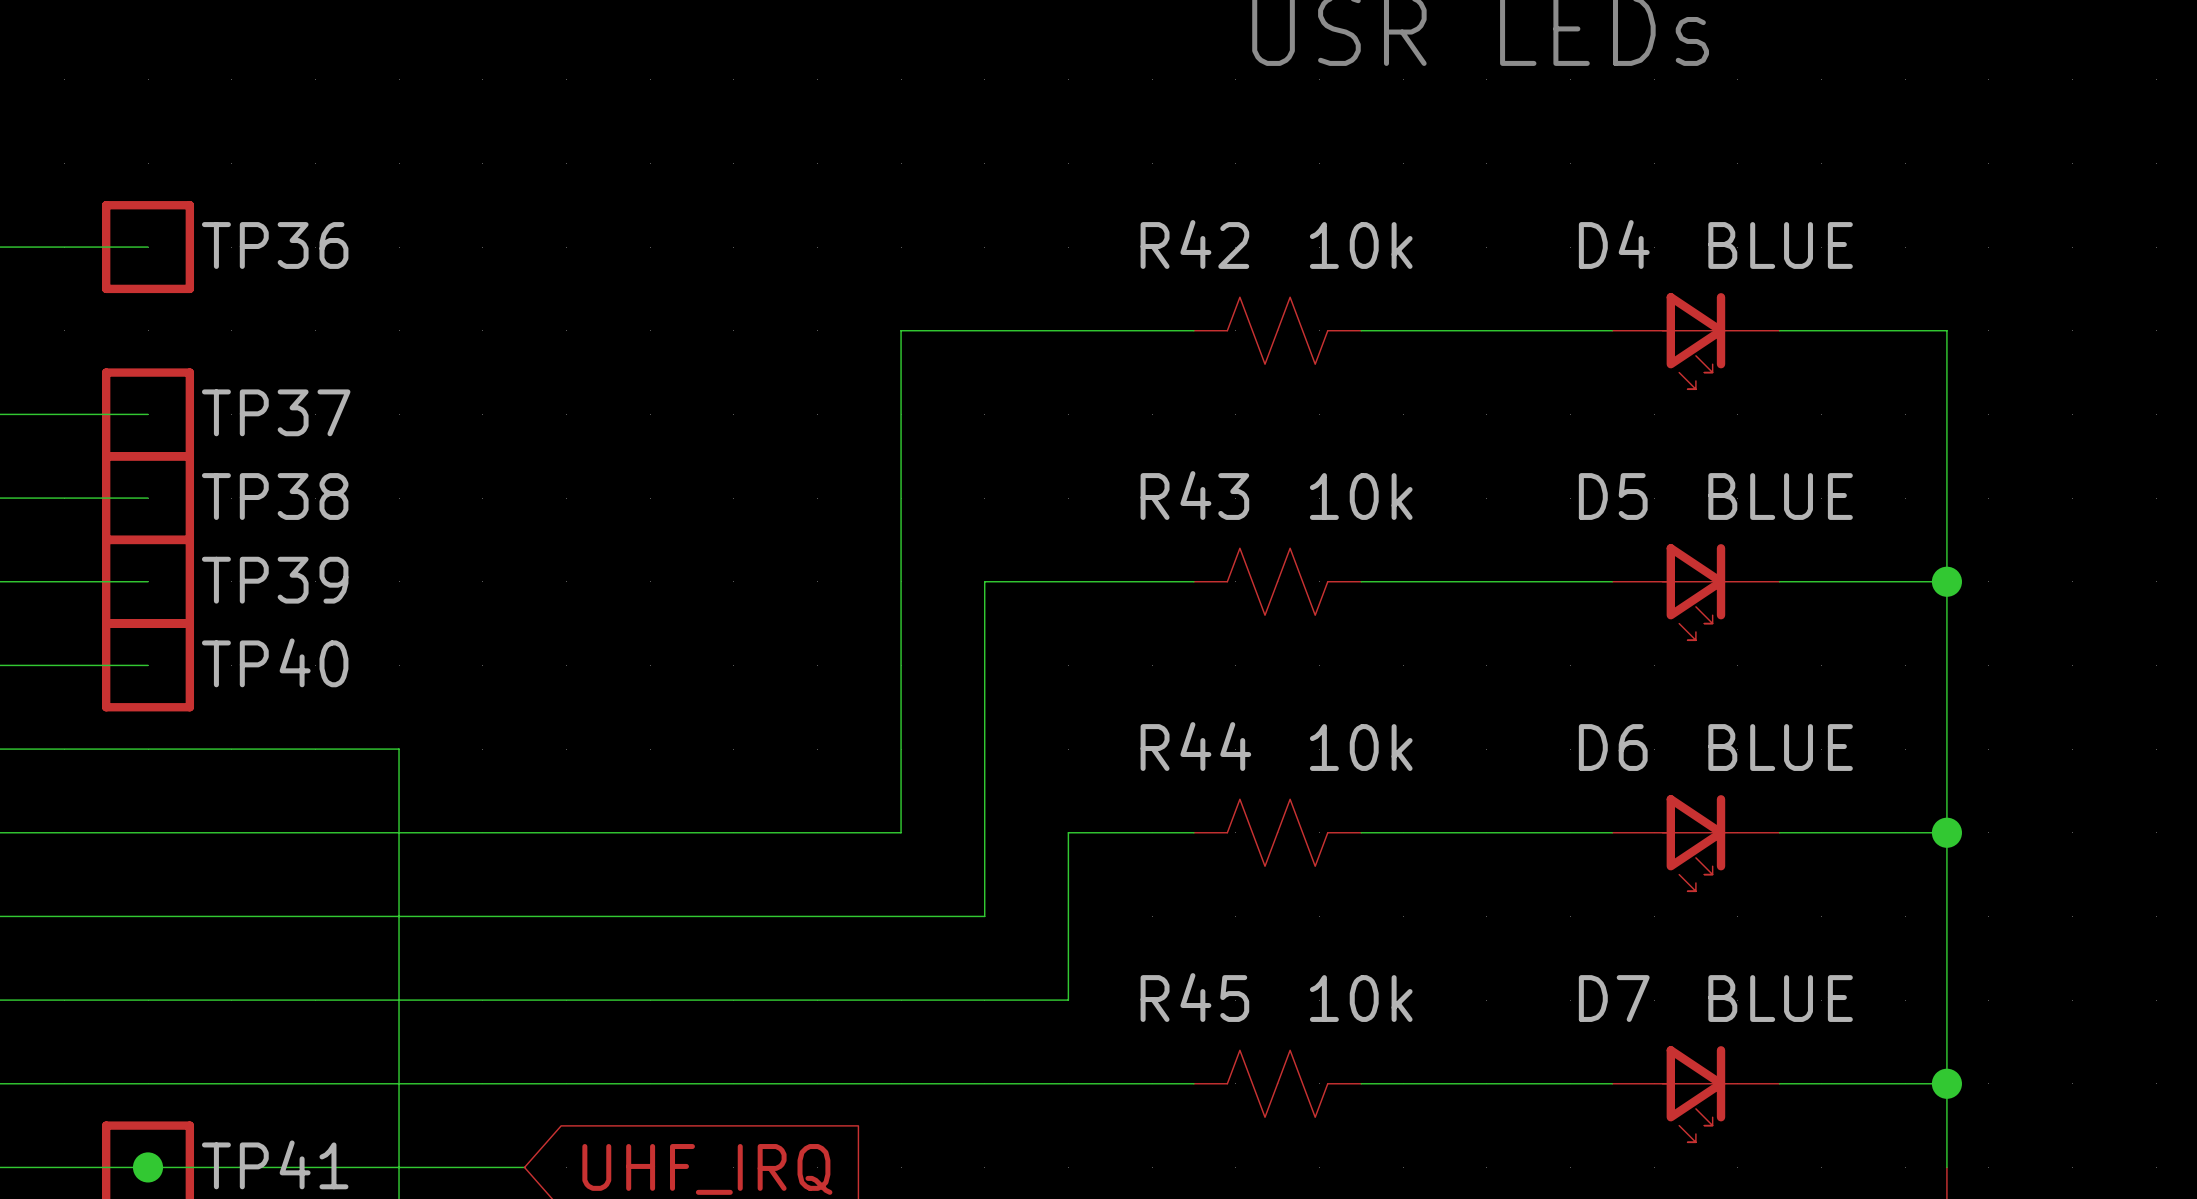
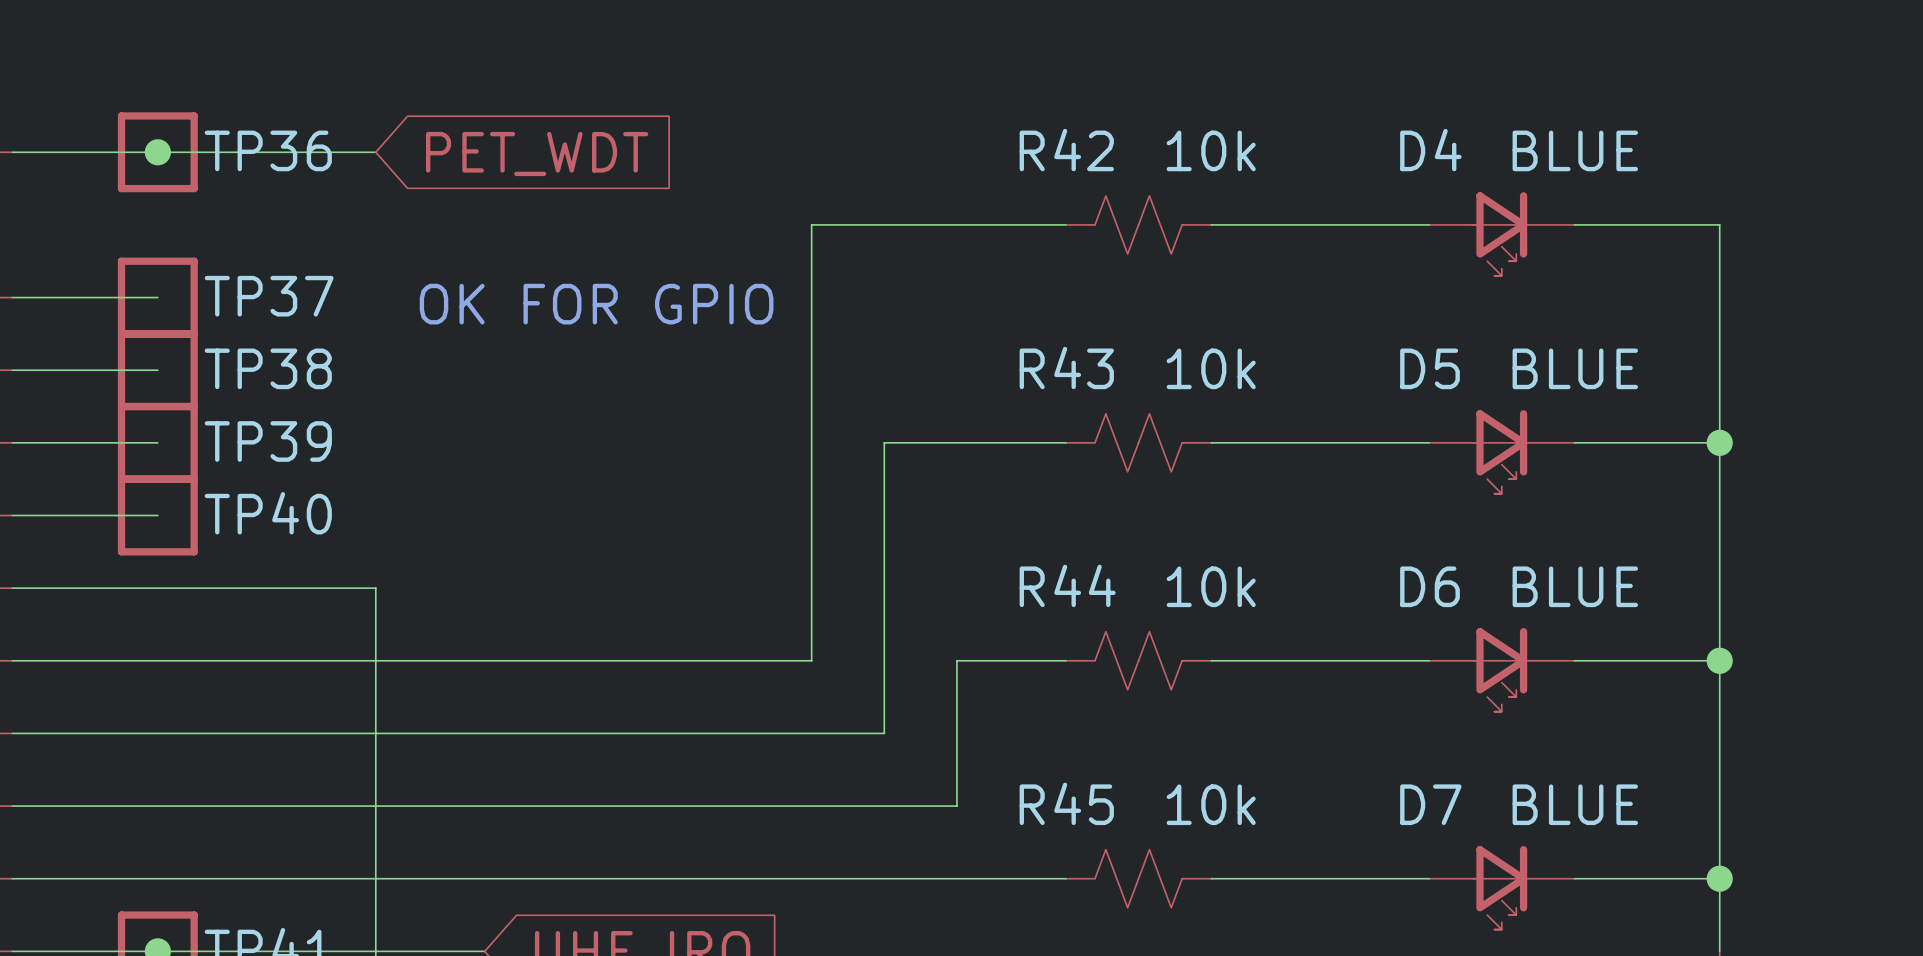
wire: none -> (157, 152) (375, 152)
junction: none -> (157, 152)
global label: none -> PET_WDT (537, 154)
text: none -> OK FOR GPIO (596, 304)

